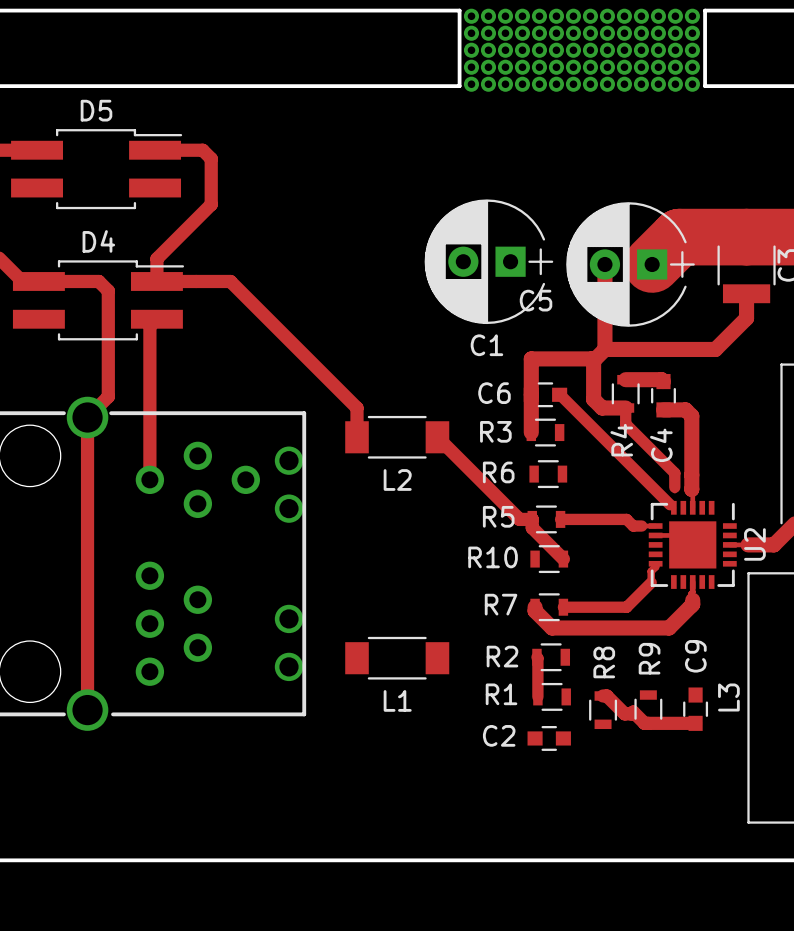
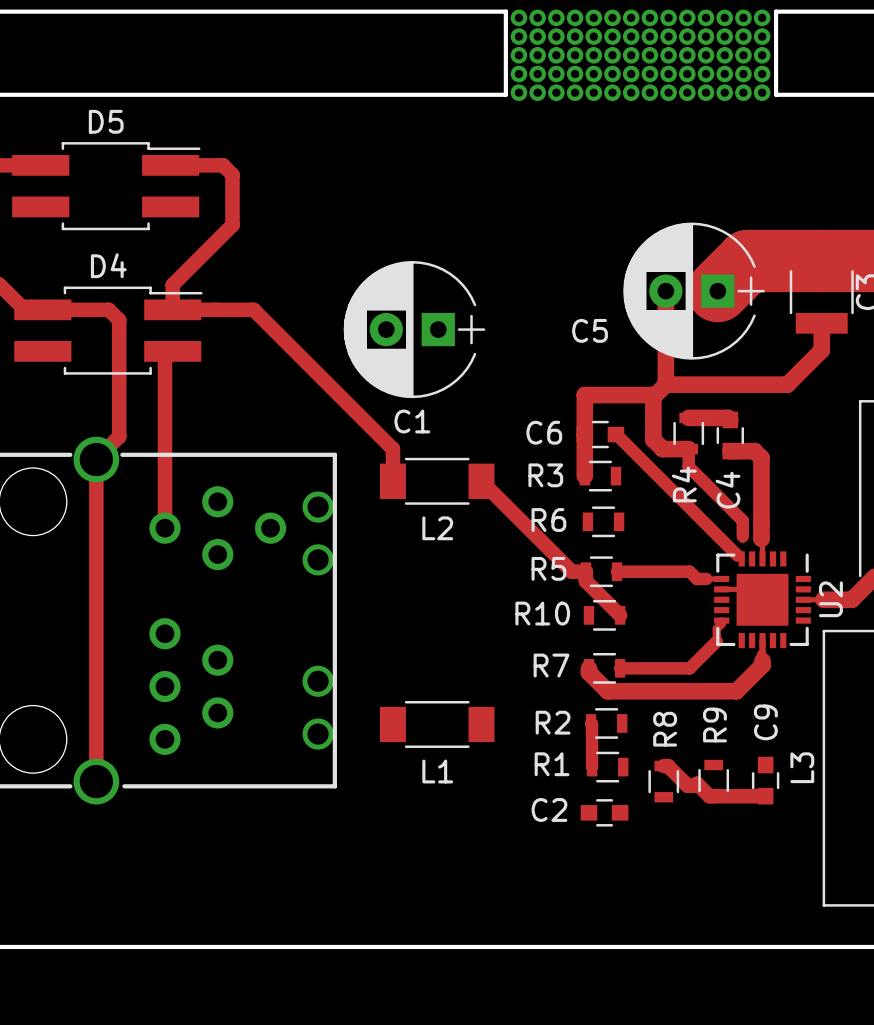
C1 position: (488, 261) -> (414, 329)

